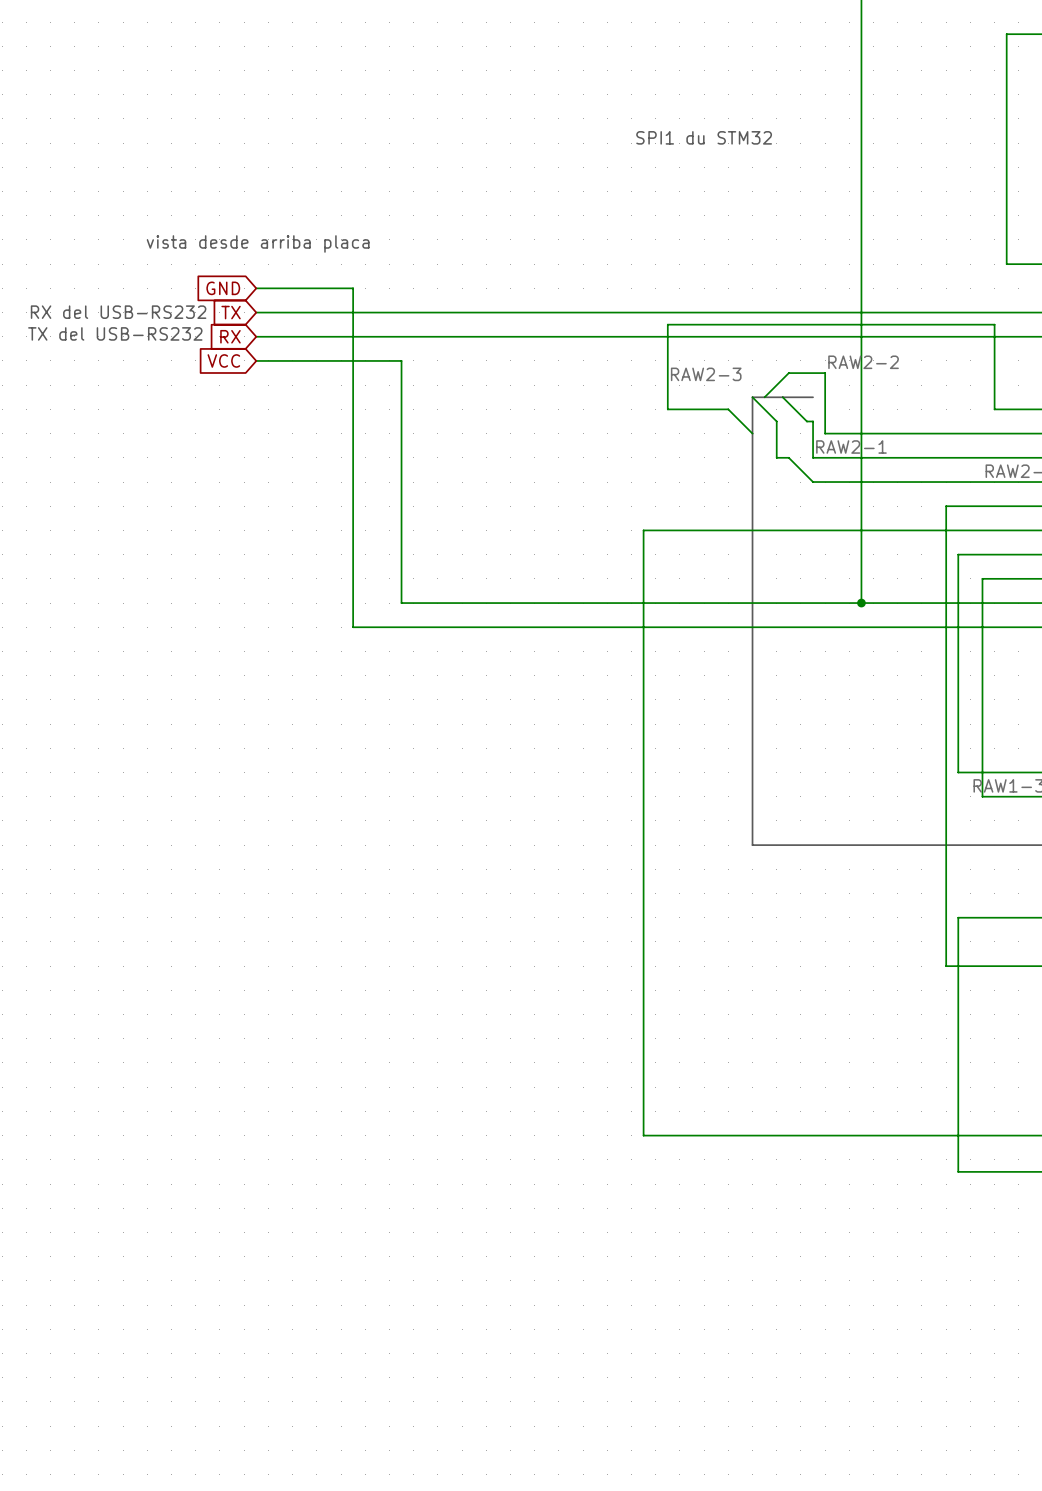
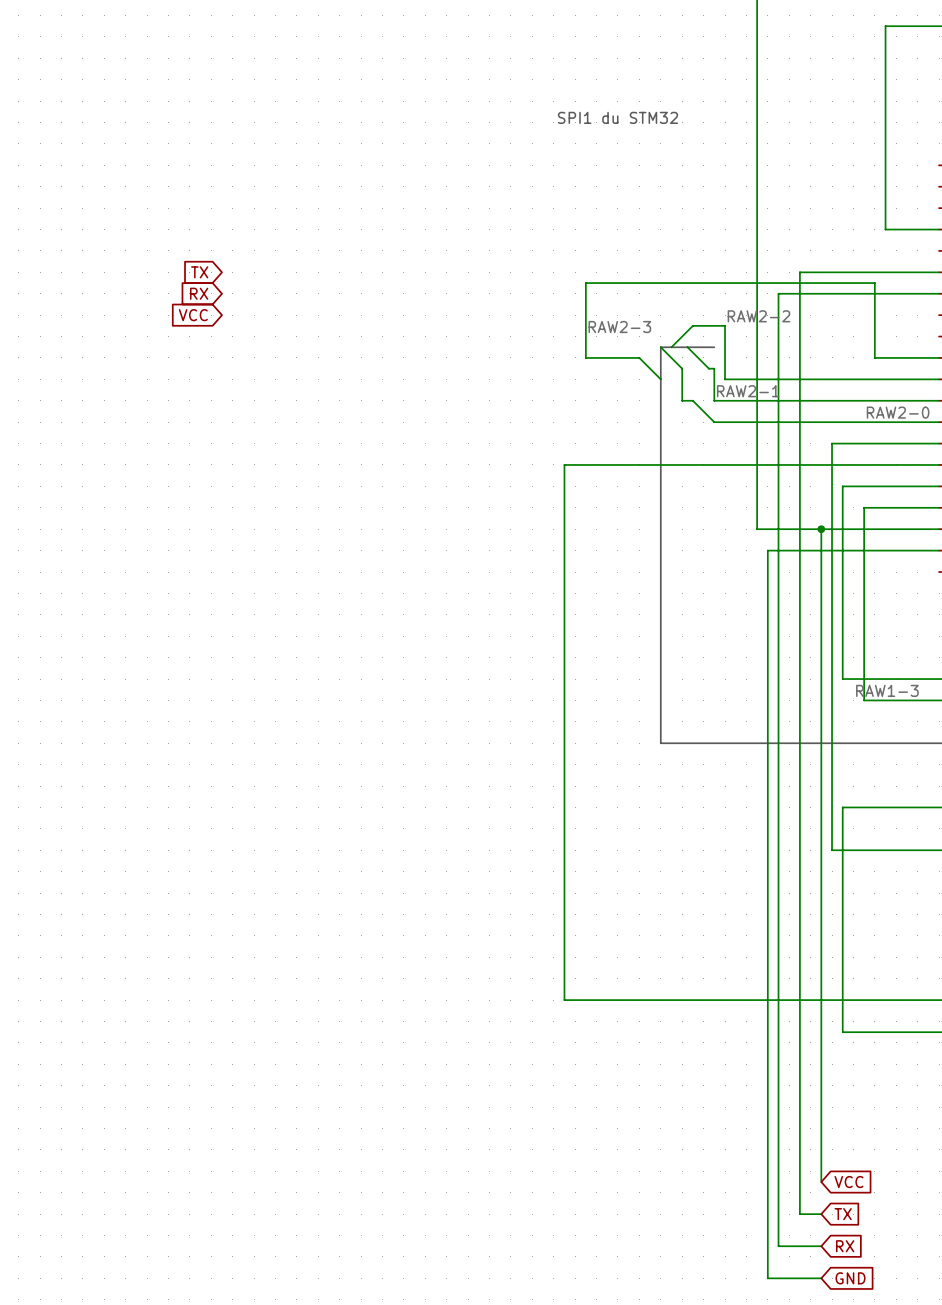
text: vista desde arriba placa (258, 243) -> none
global label: GND (223, 288) -> none
wire: (256, 288) (353, 288) (353, 627) (873, 627) -> (821, 1278) (767, 1278) (767, 550)
text: RX del USB-RS232 (118, 312) -> none
wire: (256, 312) (909, 312) -> (821, 1214) (799, 1214) (799, 272)
text: TX del USB-RS232 (115, 333) -> none
wire: (256, 336) (885, 336) -> (821, 1246) (778, 1246) (778, 293)
wire: (256, 360) (401, 360) (401, 603) (861, 603) -> none
junction: (861, 603) -> none
wire: none -> (821, 529) (821, 1182)
junction: none -> (821, 529)
global label: none -> VCC (848, 1182)
global label: none -> TX (843, 1214)
global label: none -> RX (845, 1246)
global label: none -> GND (850, 1278)

